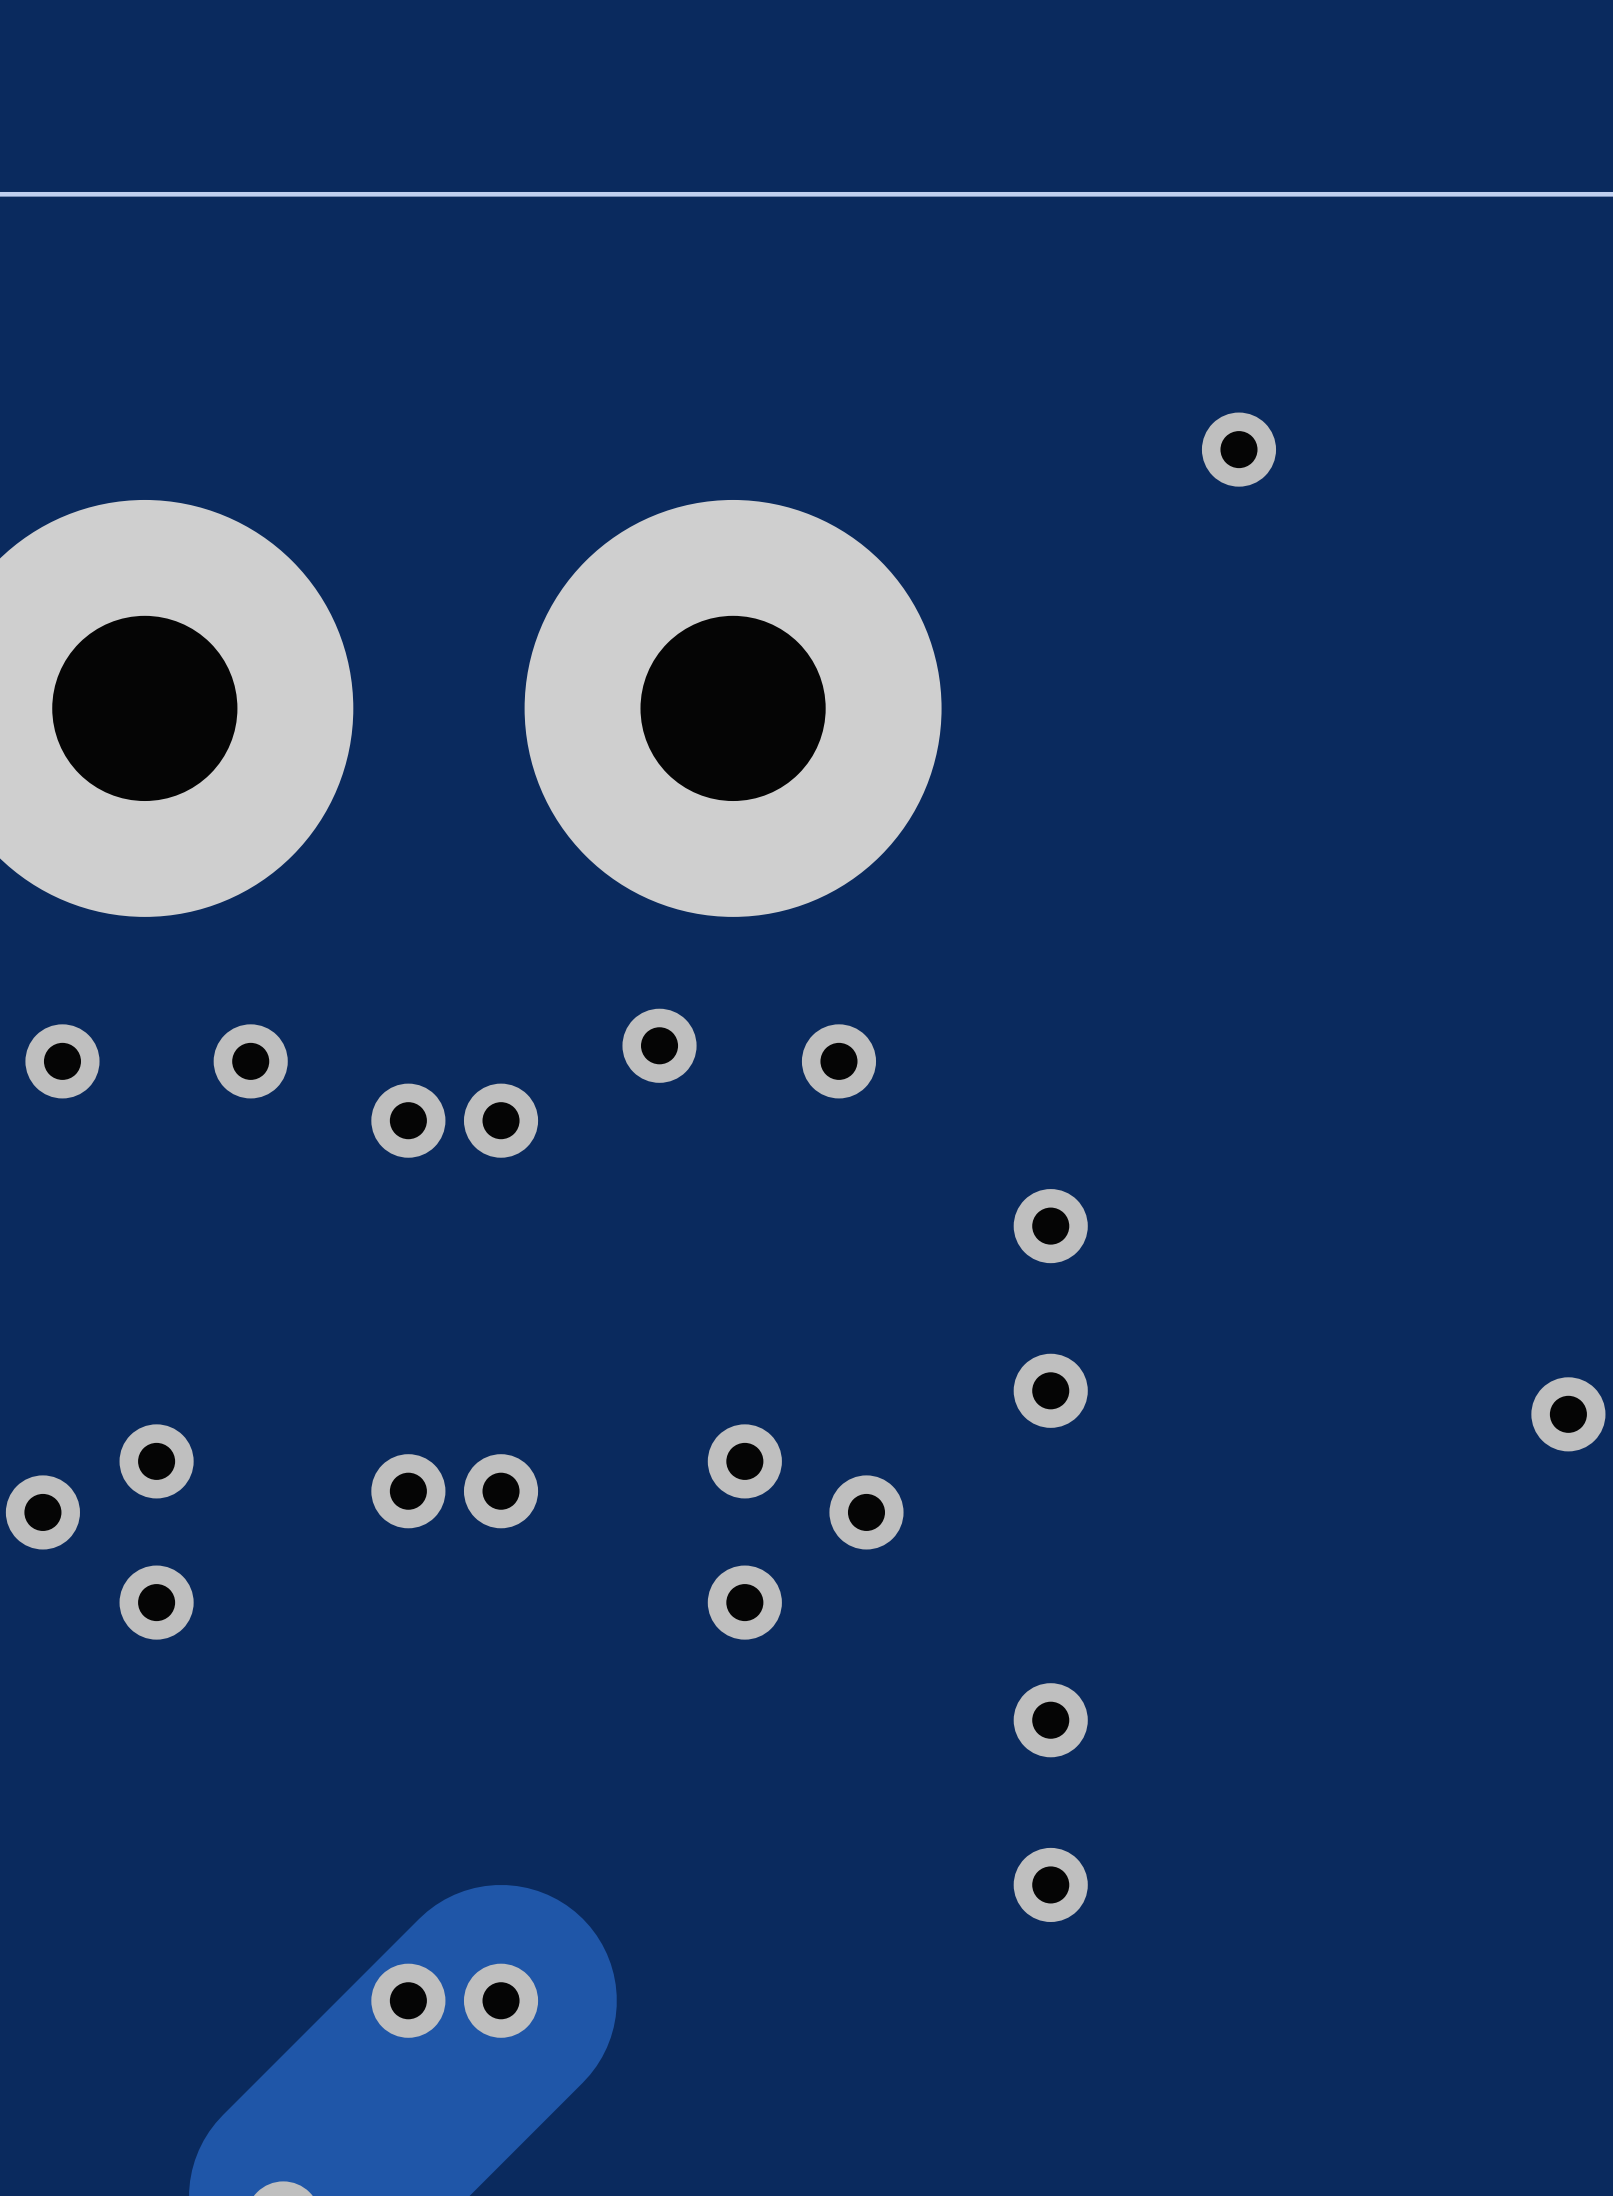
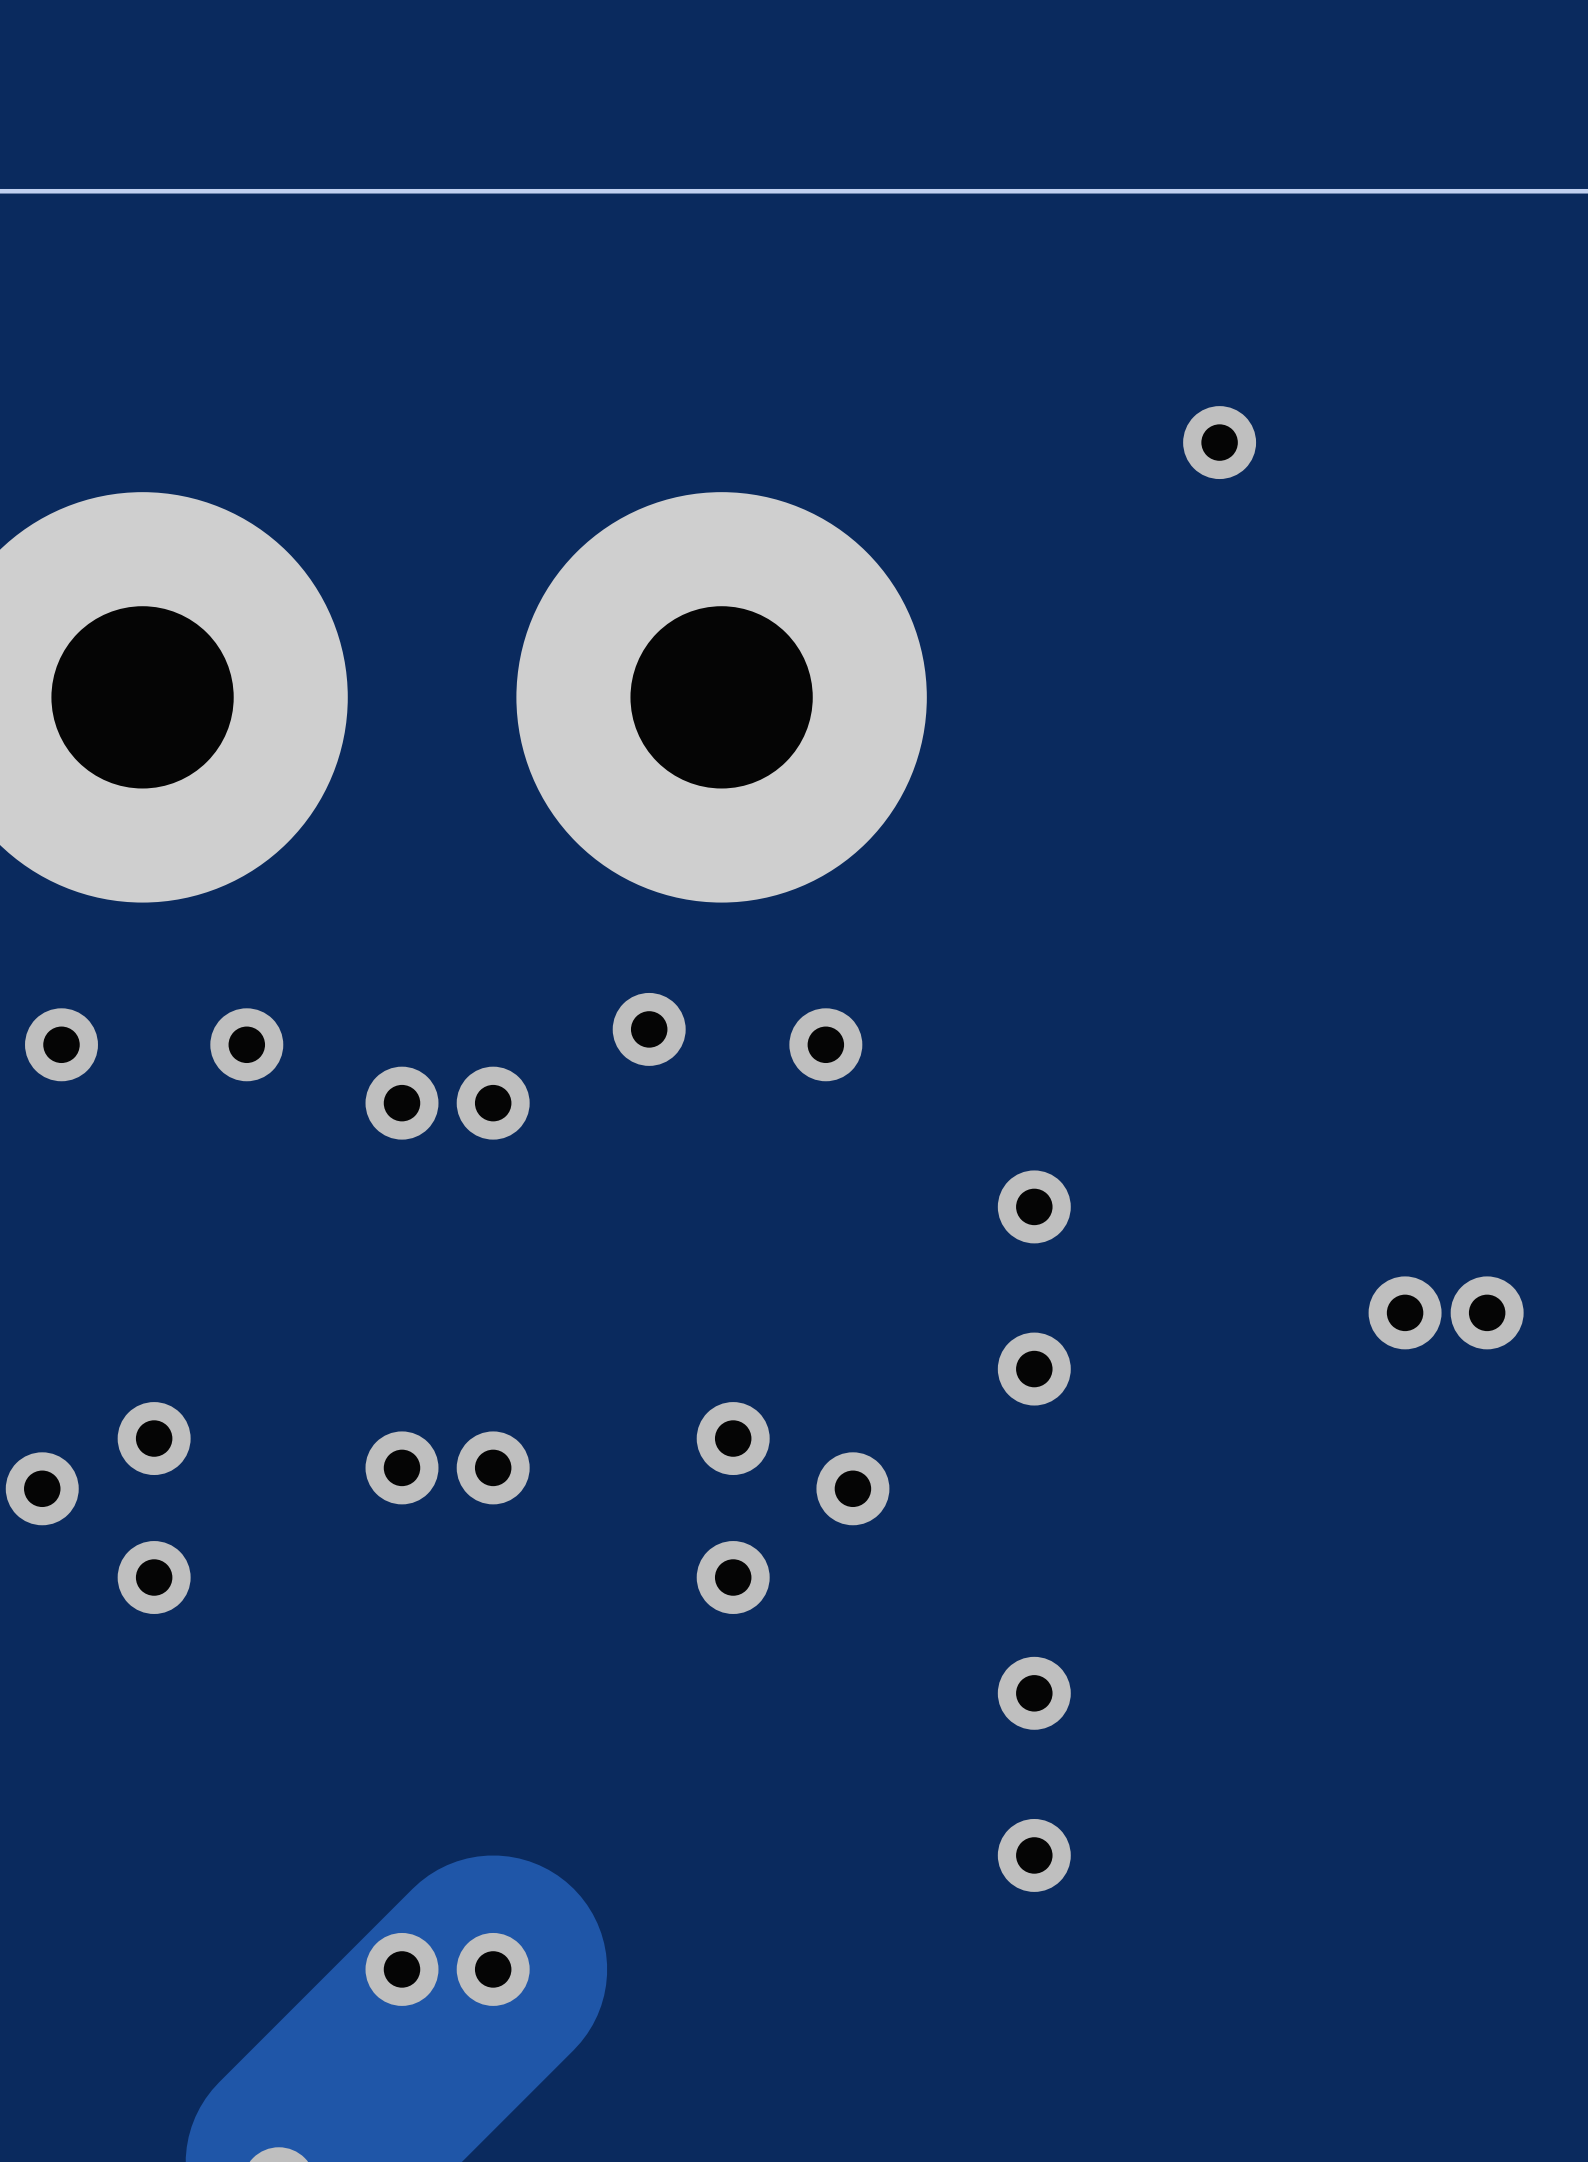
via: none -> (1405, 1312)
via: none -> (1487, 1312)
via: (1568, 1414) -> none

